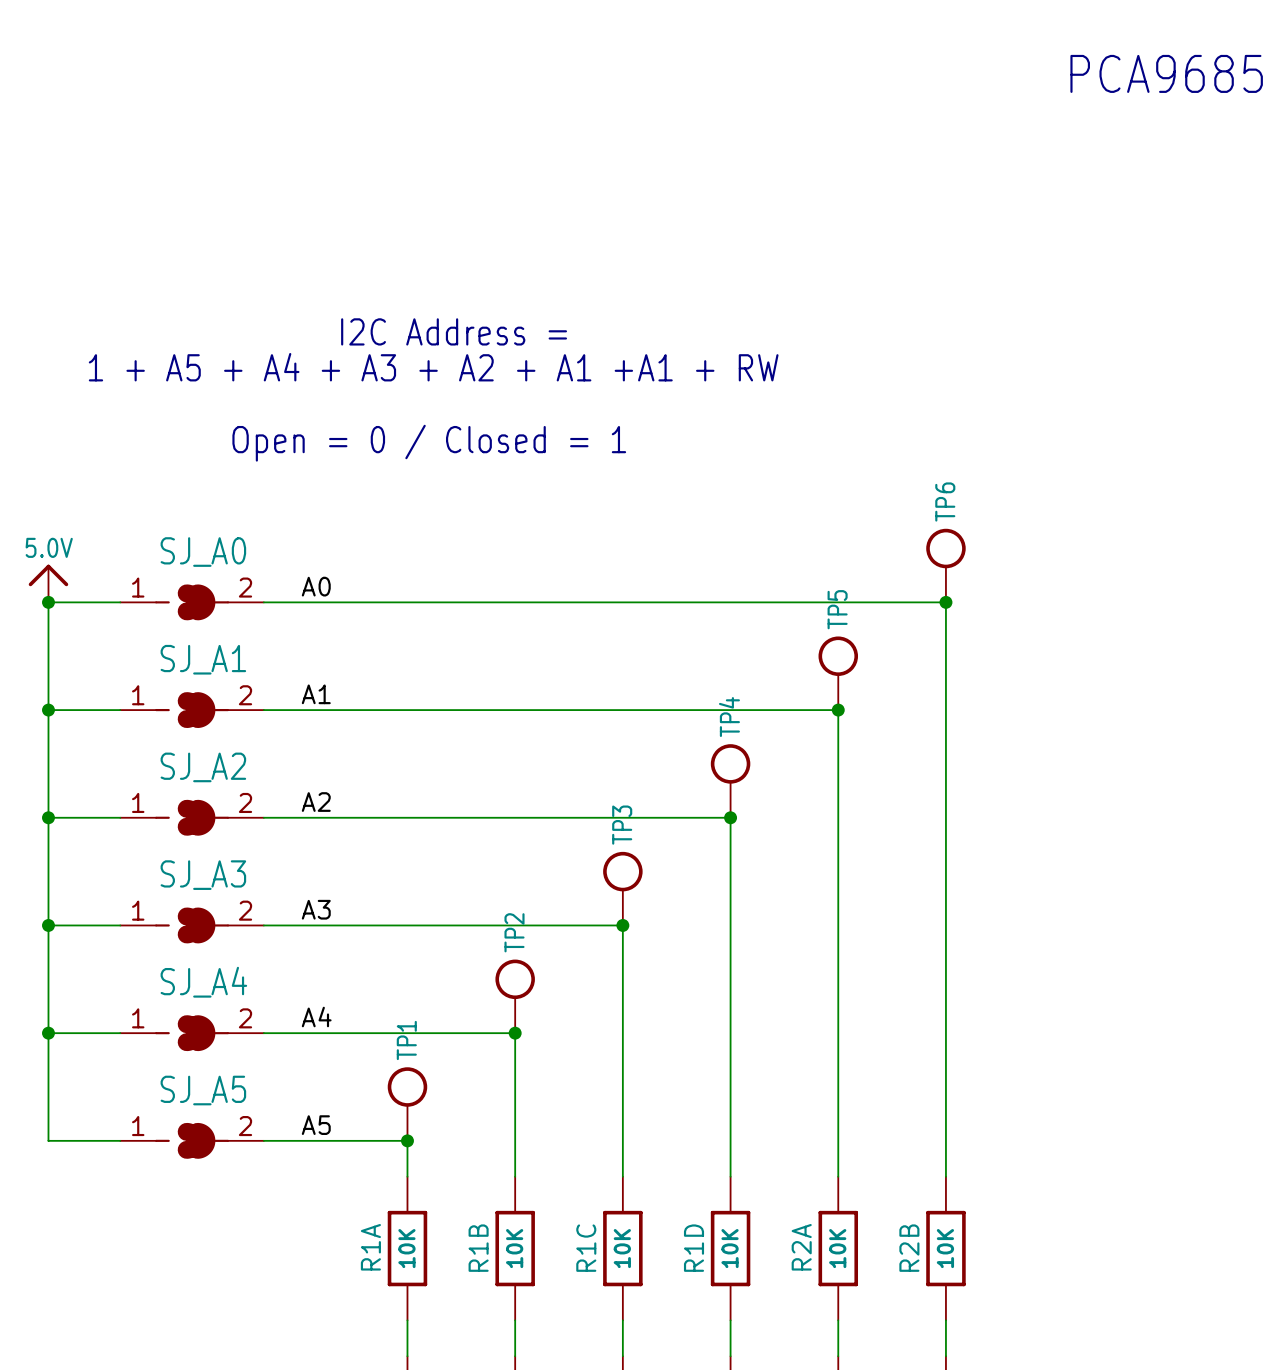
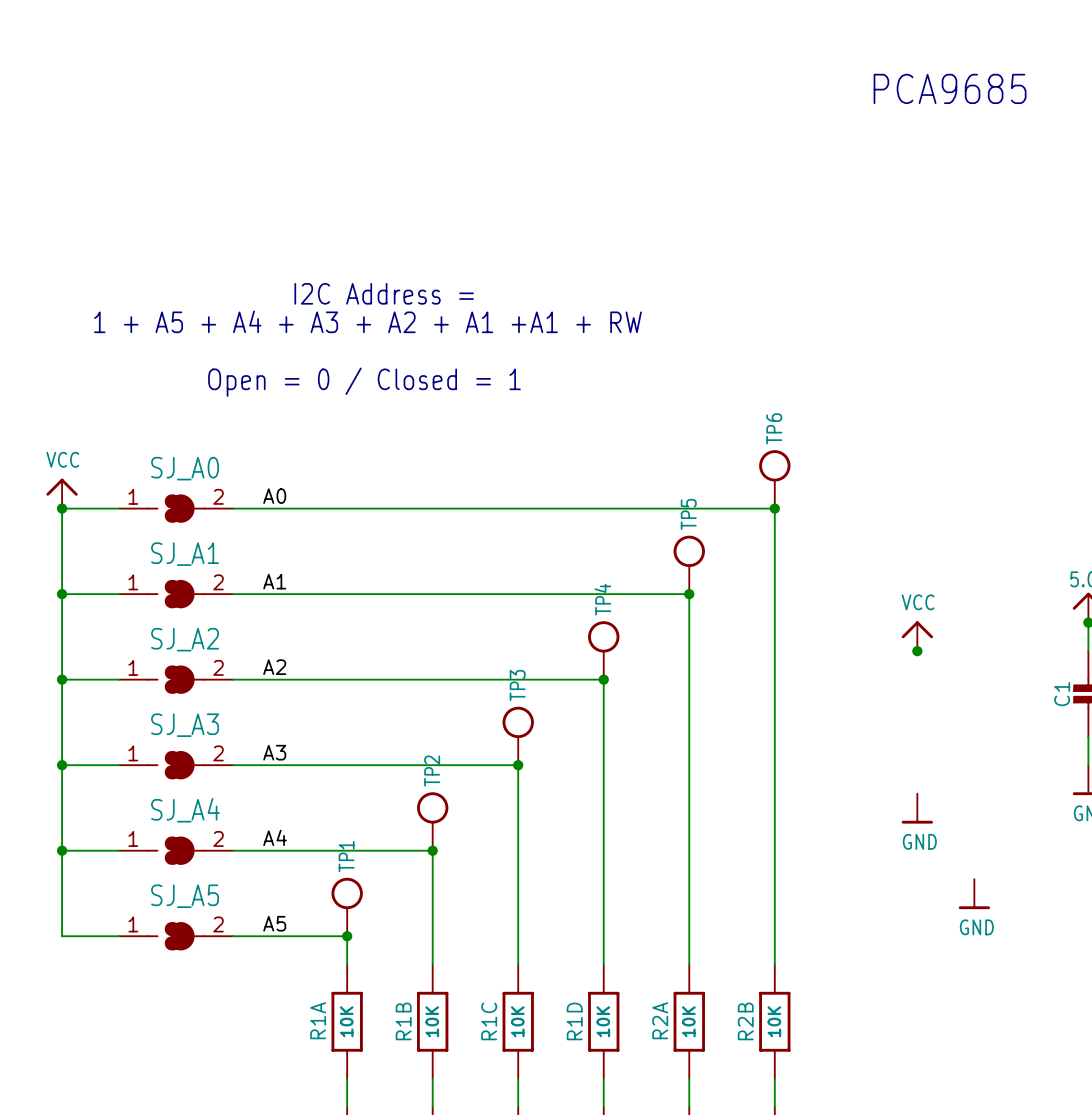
power symbol: 5.0V (48, 583) -> VCC (62, 493)
power symbol: none -> VCC (917, 636)
junction: none -> (917, 651)
power symbol: none -> GND (917, 808)
power symbol: none -> GND (974, 894)

